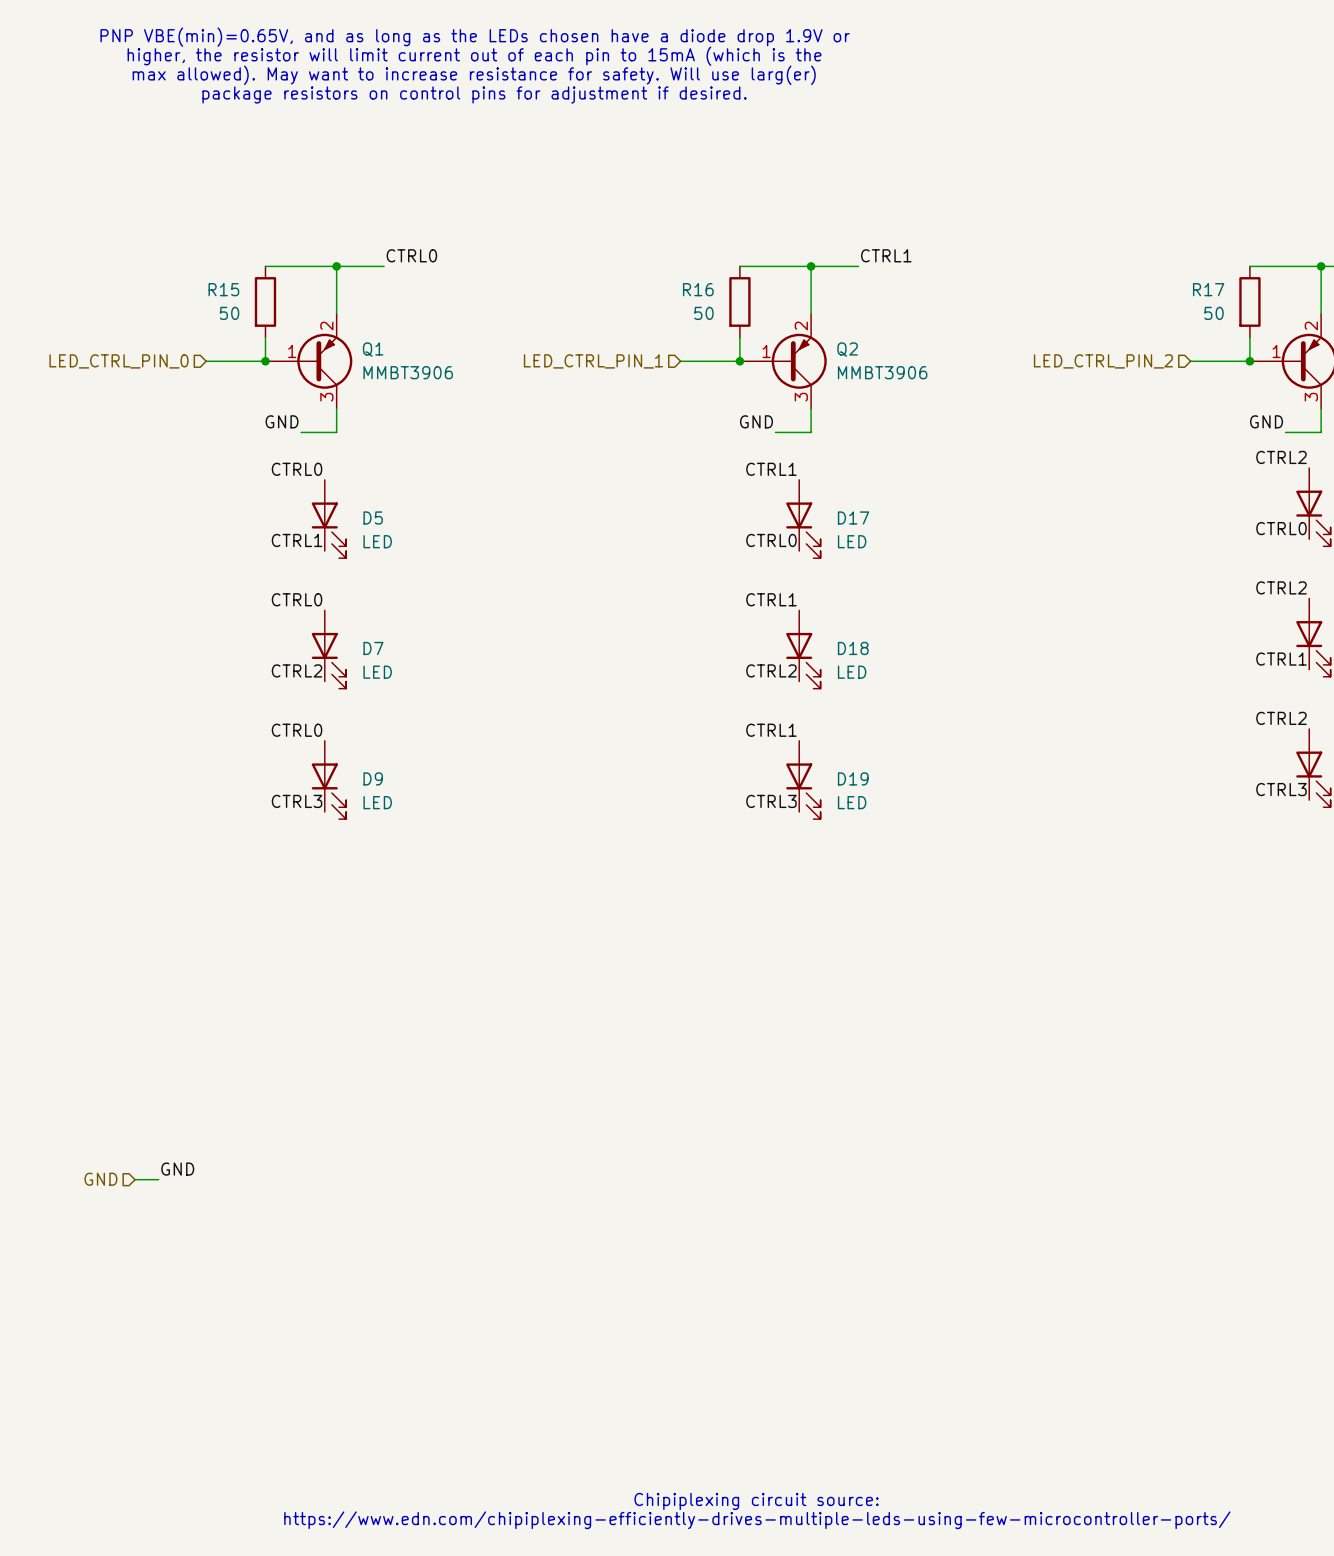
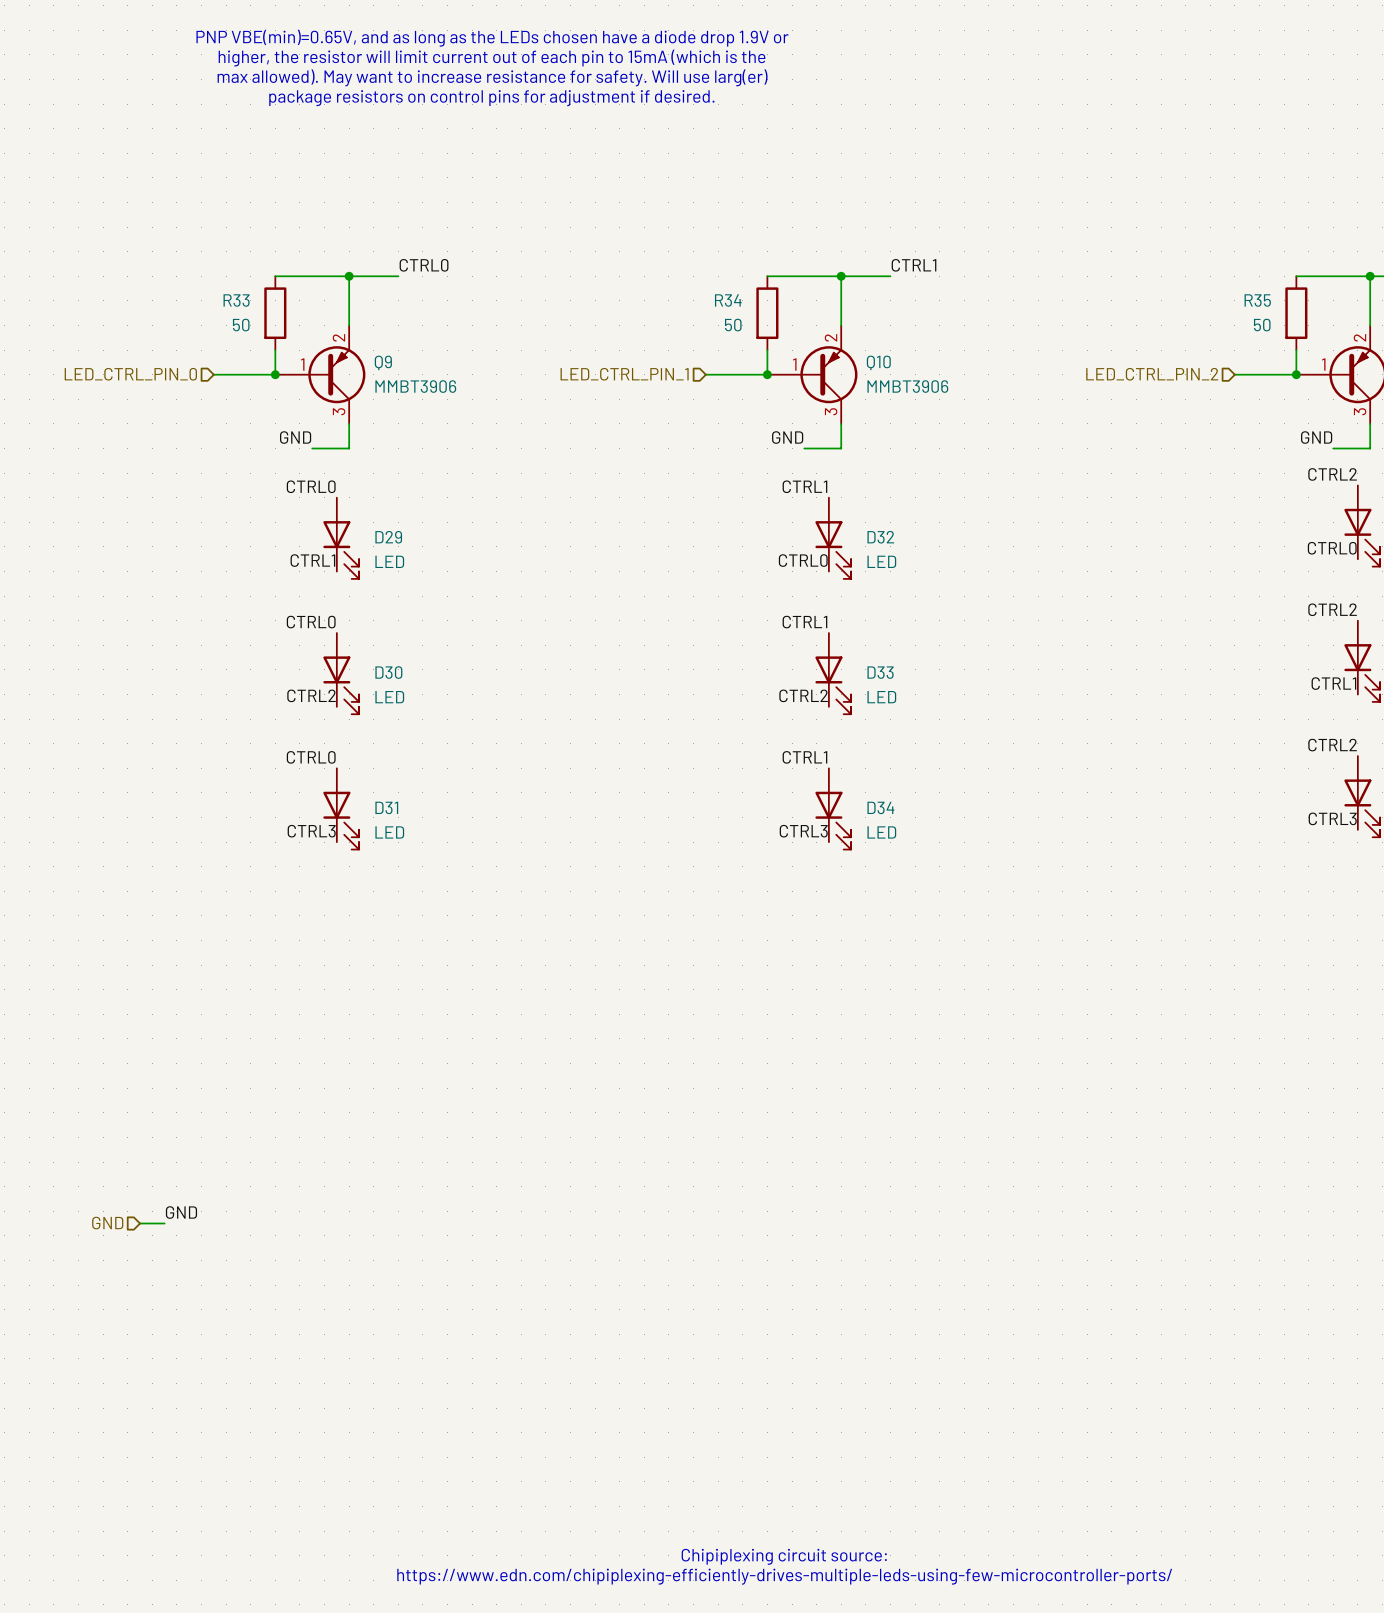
R15 name: R15 (223, 289) -> R33 (236, 300)
R16 name: R16 (698, 289) -> R34 (728, 300)
R17 name: R17 (1208, 289) -> R35 (1257, 300)
Q1 name: Q1 (373, 349) -> Q9 (383, 362)
Q2 name: Q2 (847, 349) -> Q10 (878, 362)
D5 name: D5 (373, 517) -> D29 (388, 537)
D17 name: D17 (853, 517) -> D32 (880, 537)
D7 name: D7 (373, 648) -> D30 (388, 672)
D18 name: D18 (853, 648) -> D33 (880, 672)
D9 name: D9 (373, 778) -> D31 (386, 807)
D19 name: D19 (853, 778) -> D34 (880, 807)

